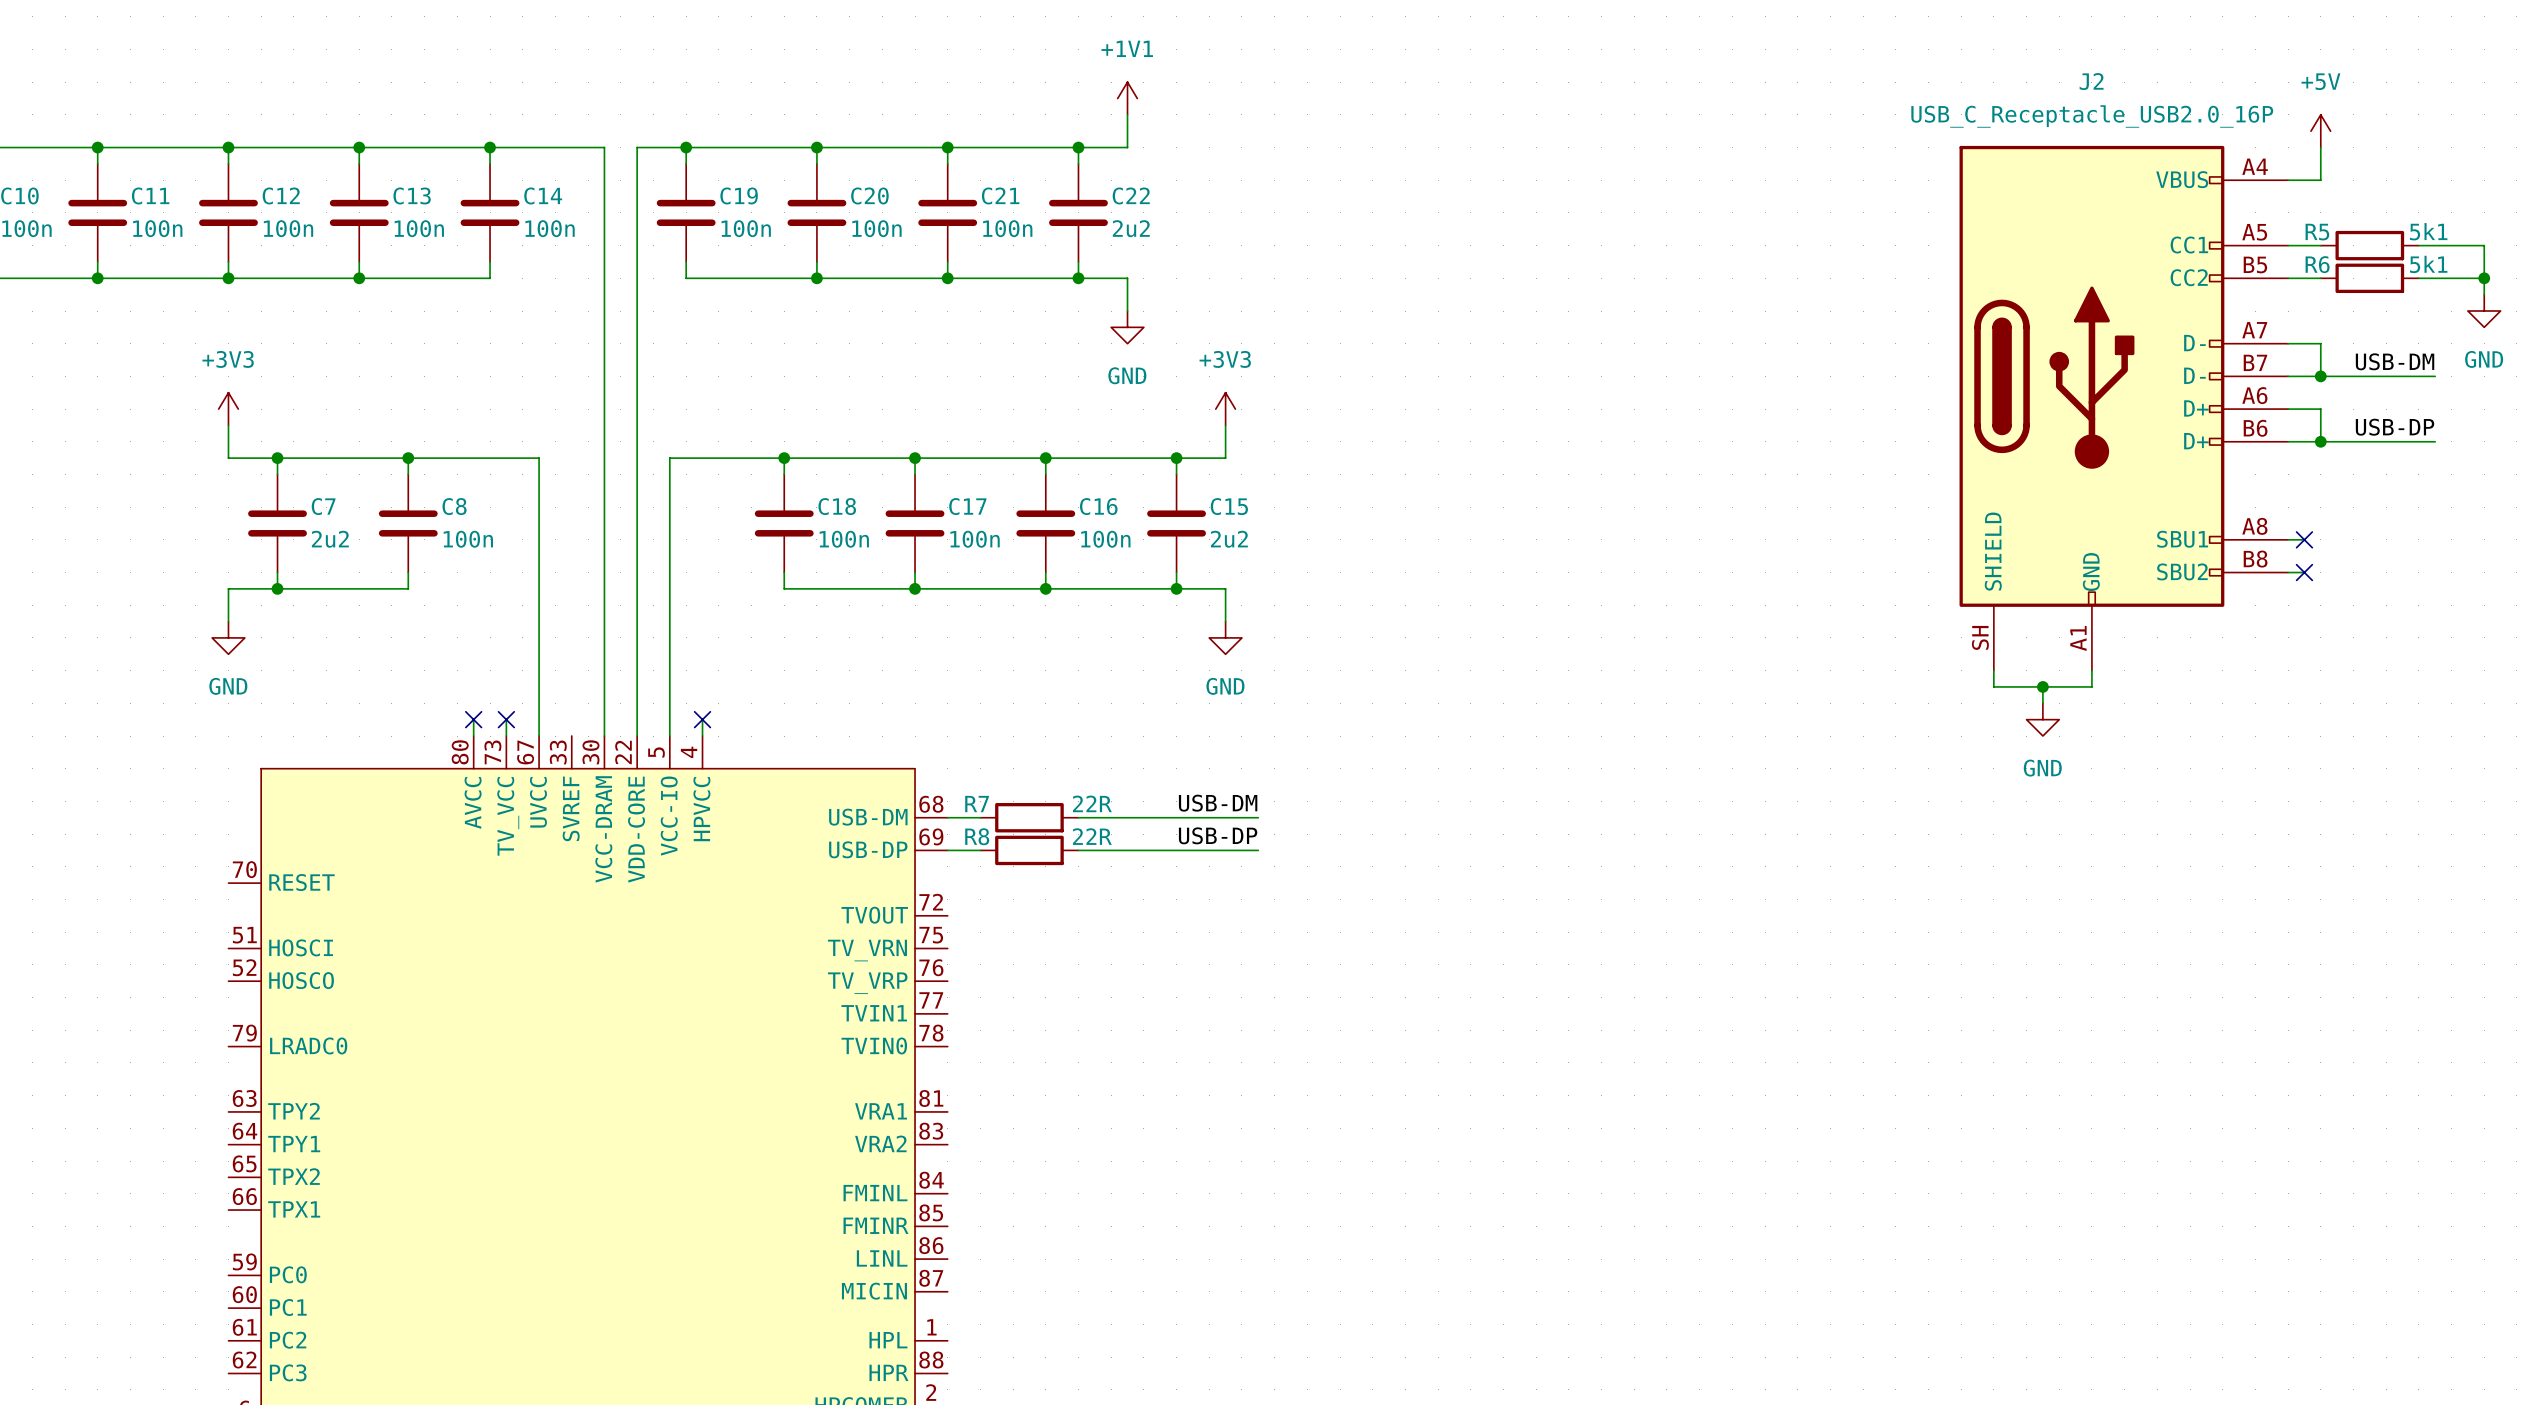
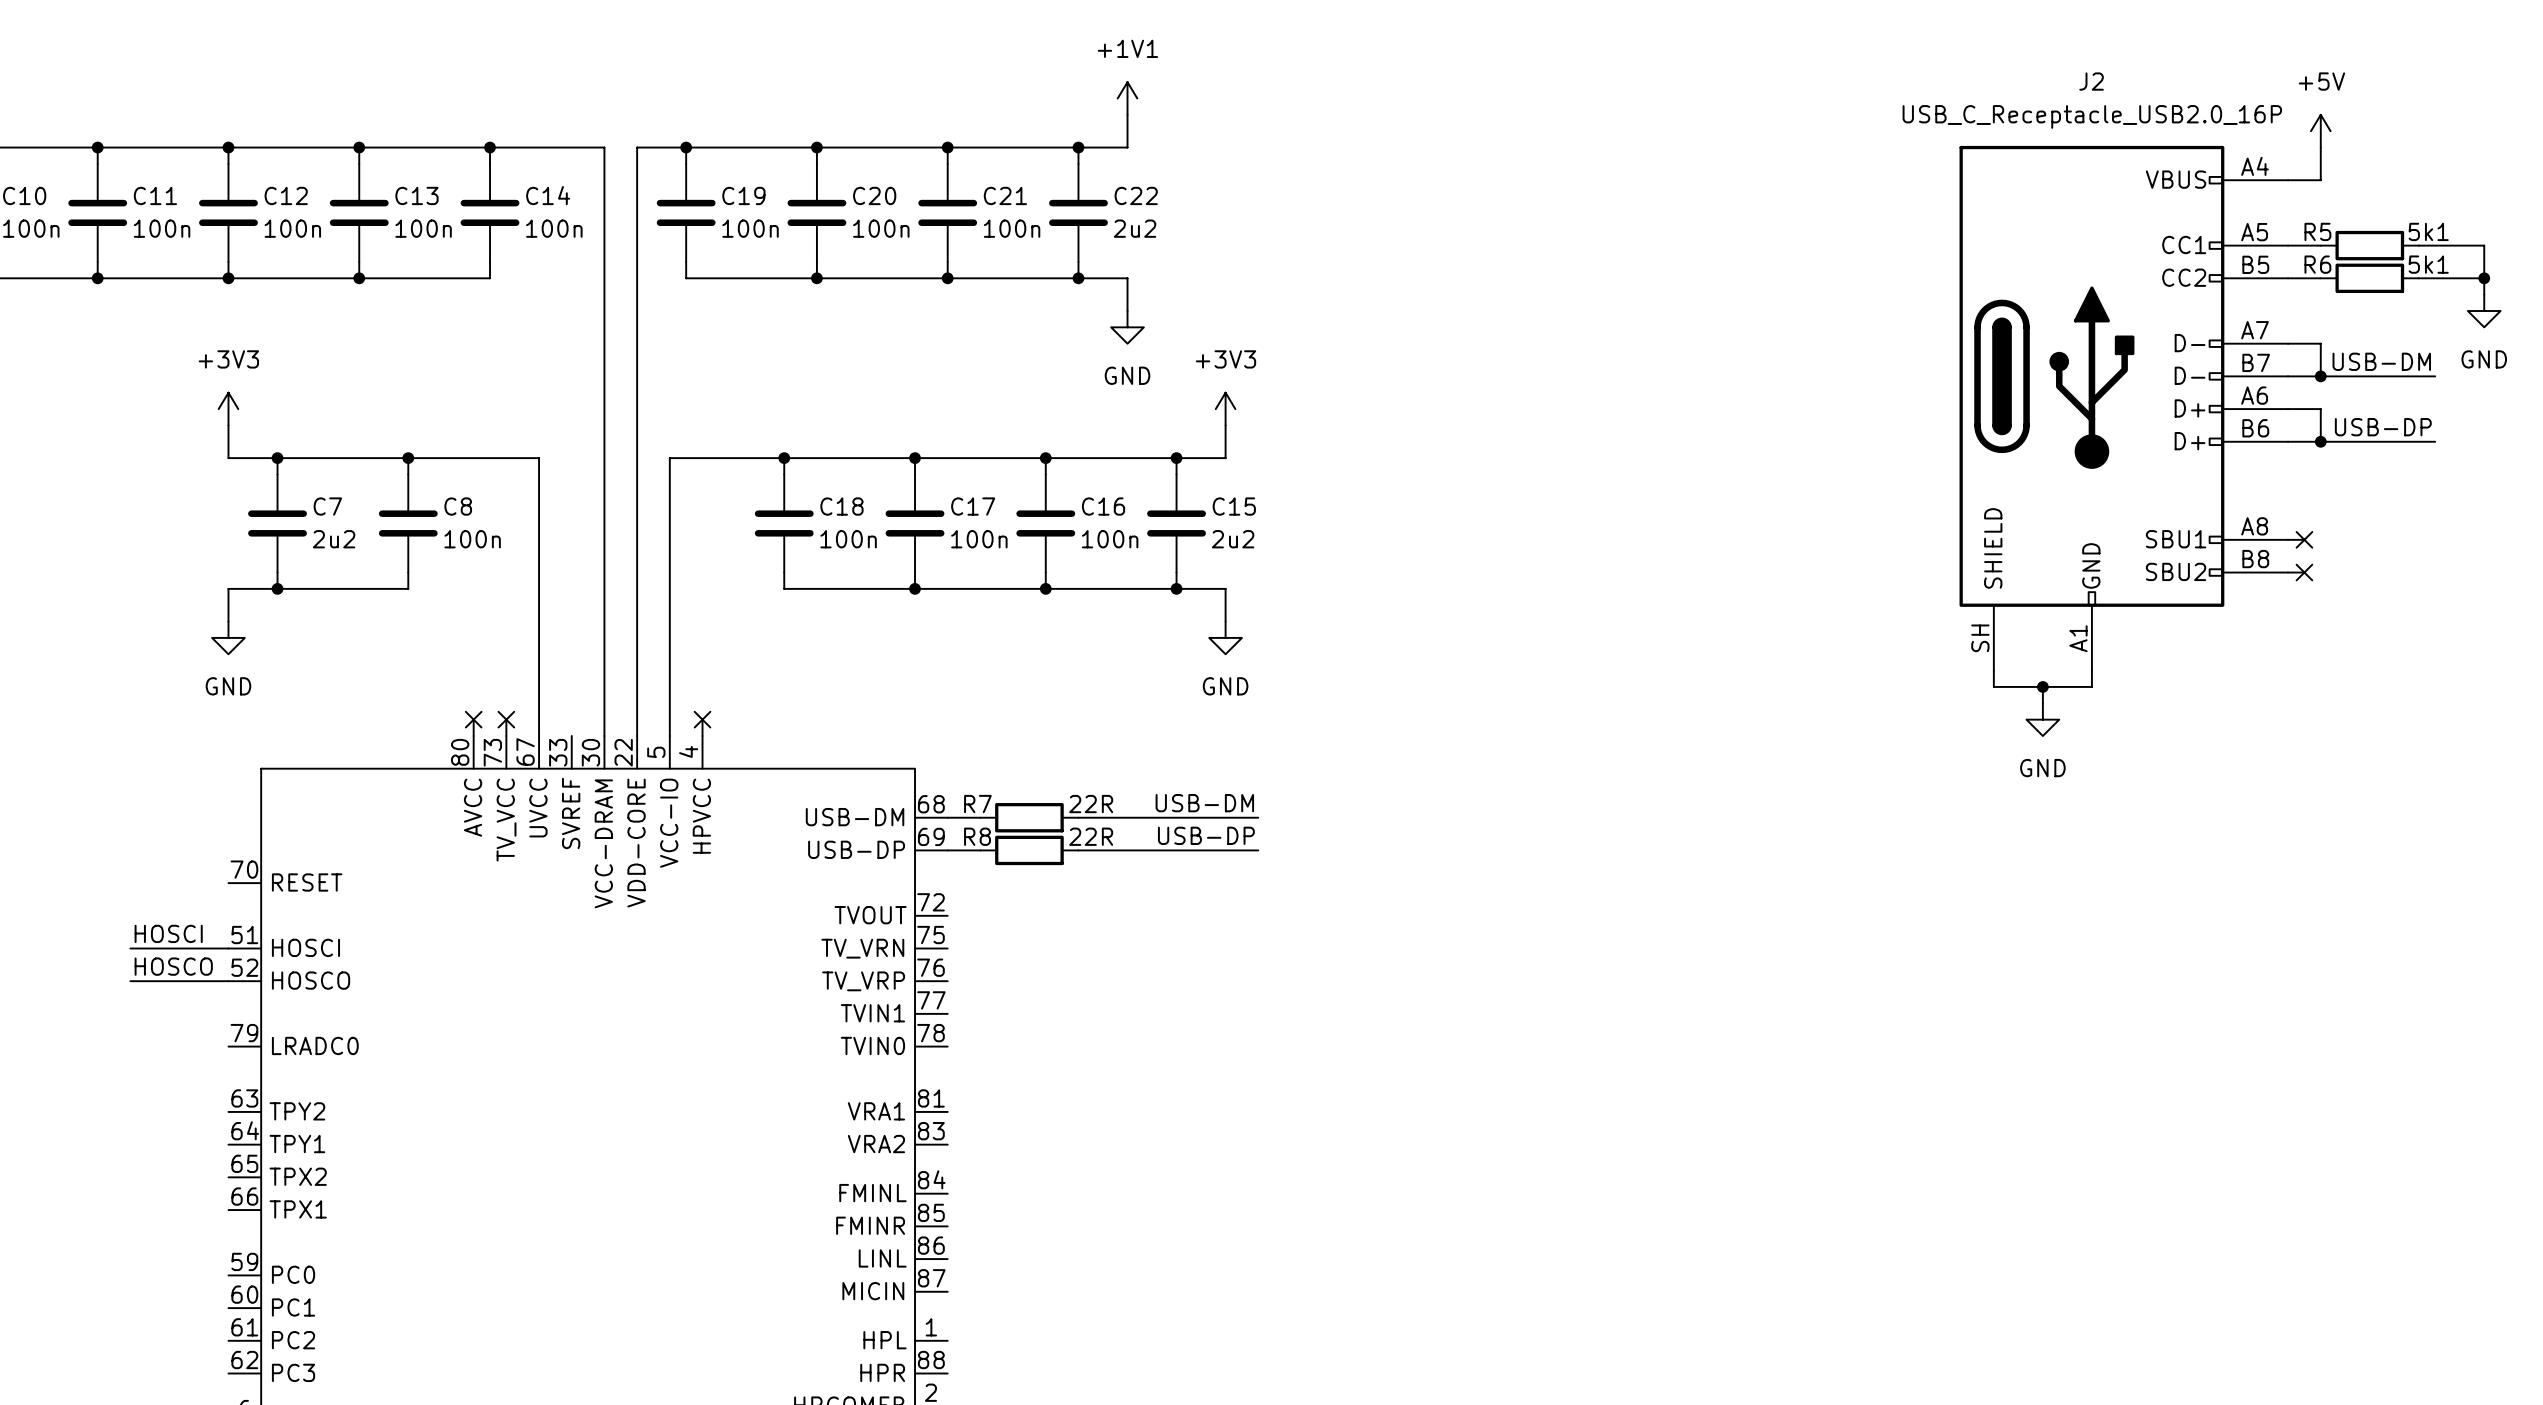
label: none -> HOSCI (168, 933)
wire: none -> (130, 948) (228, 948)
label: none -> HOSCO (173, 966)
wire: none -> (130, 981) (228, 981)

